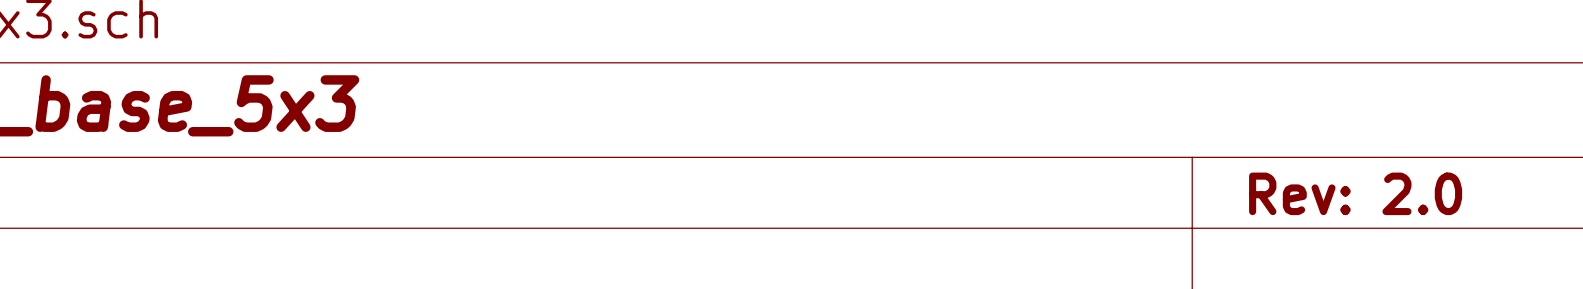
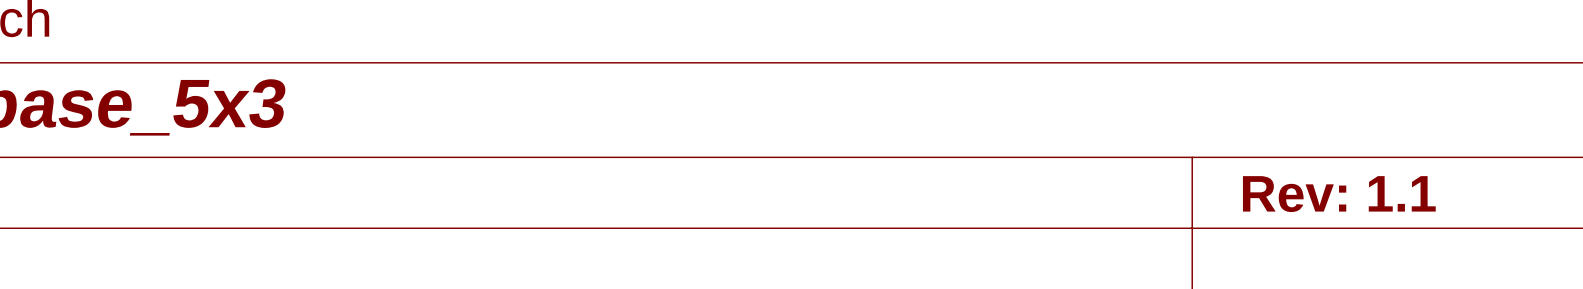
title block: Rev: 2.0 (1355, 193) -> Rev: 1.1 (1339, 194)

